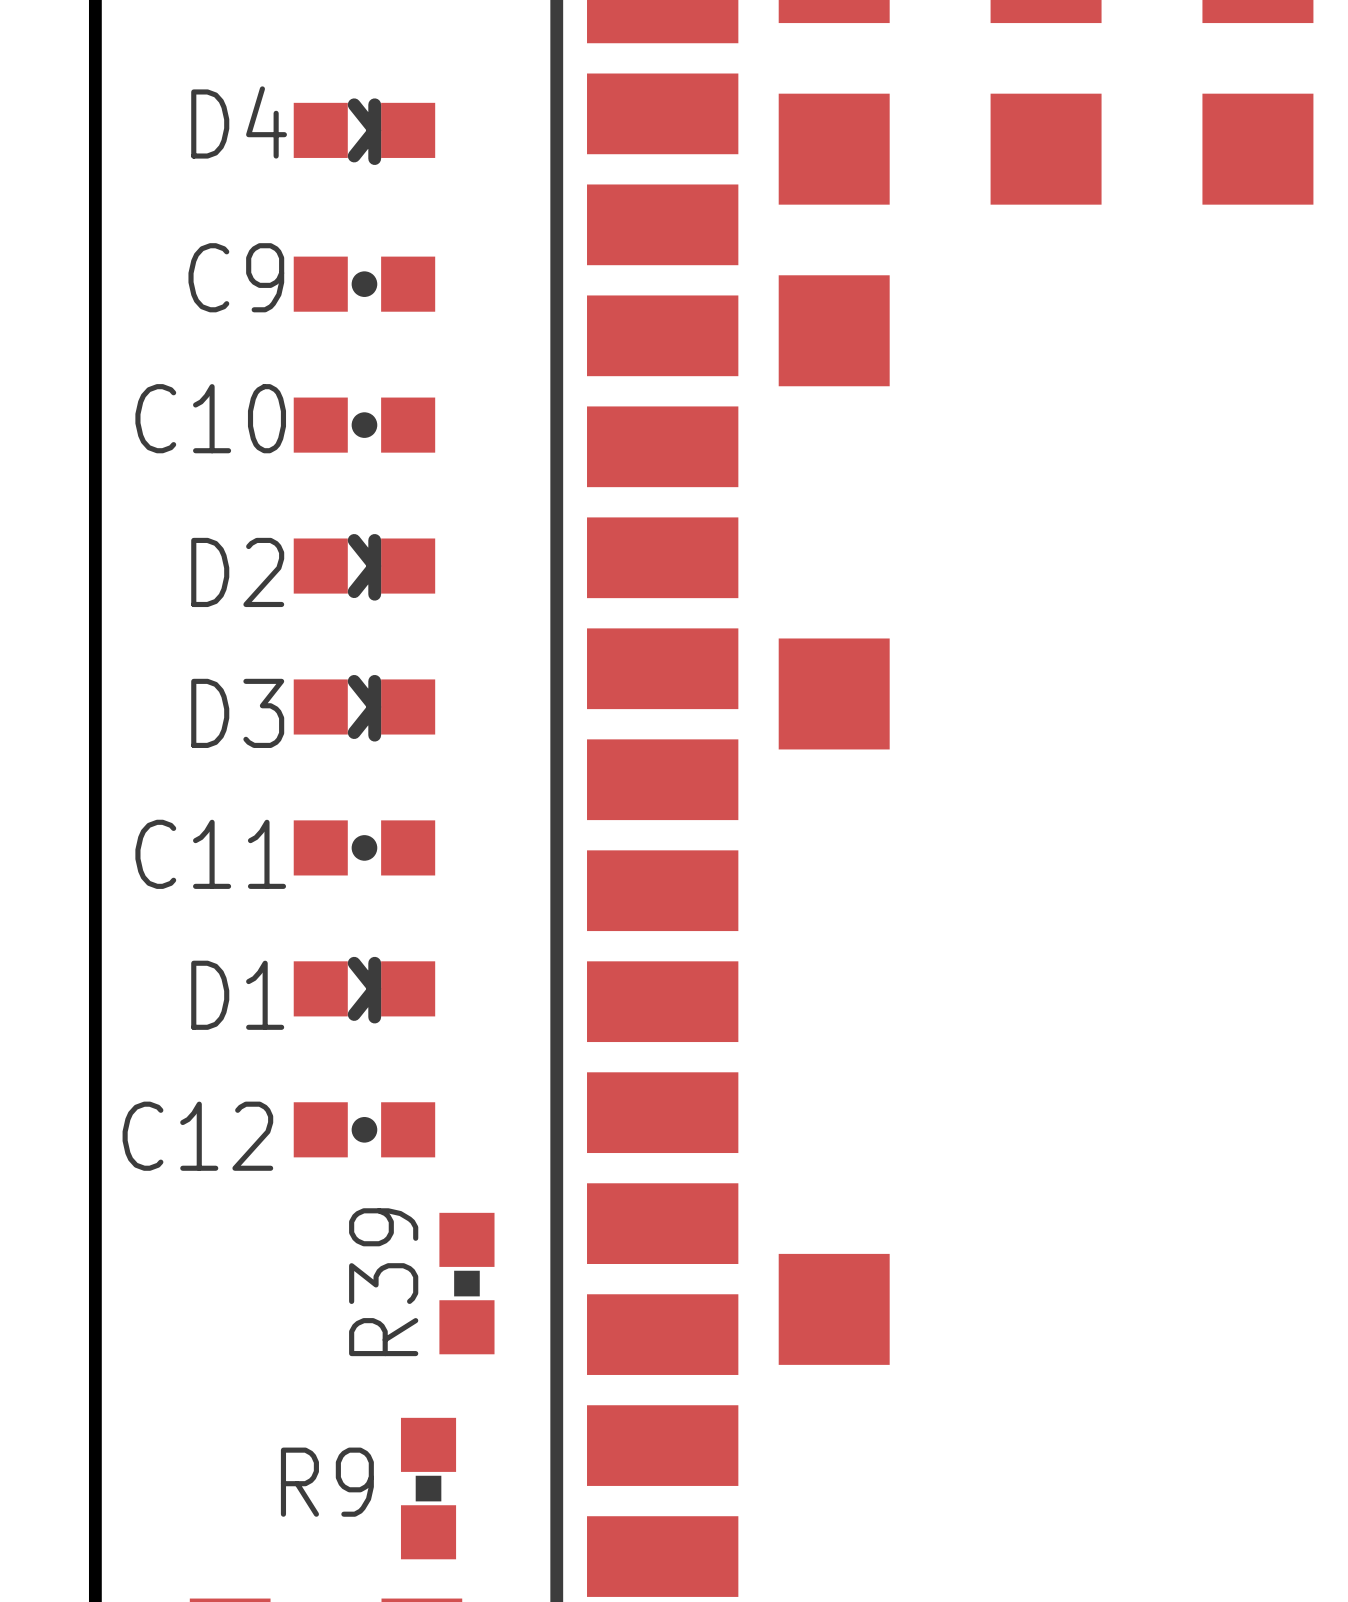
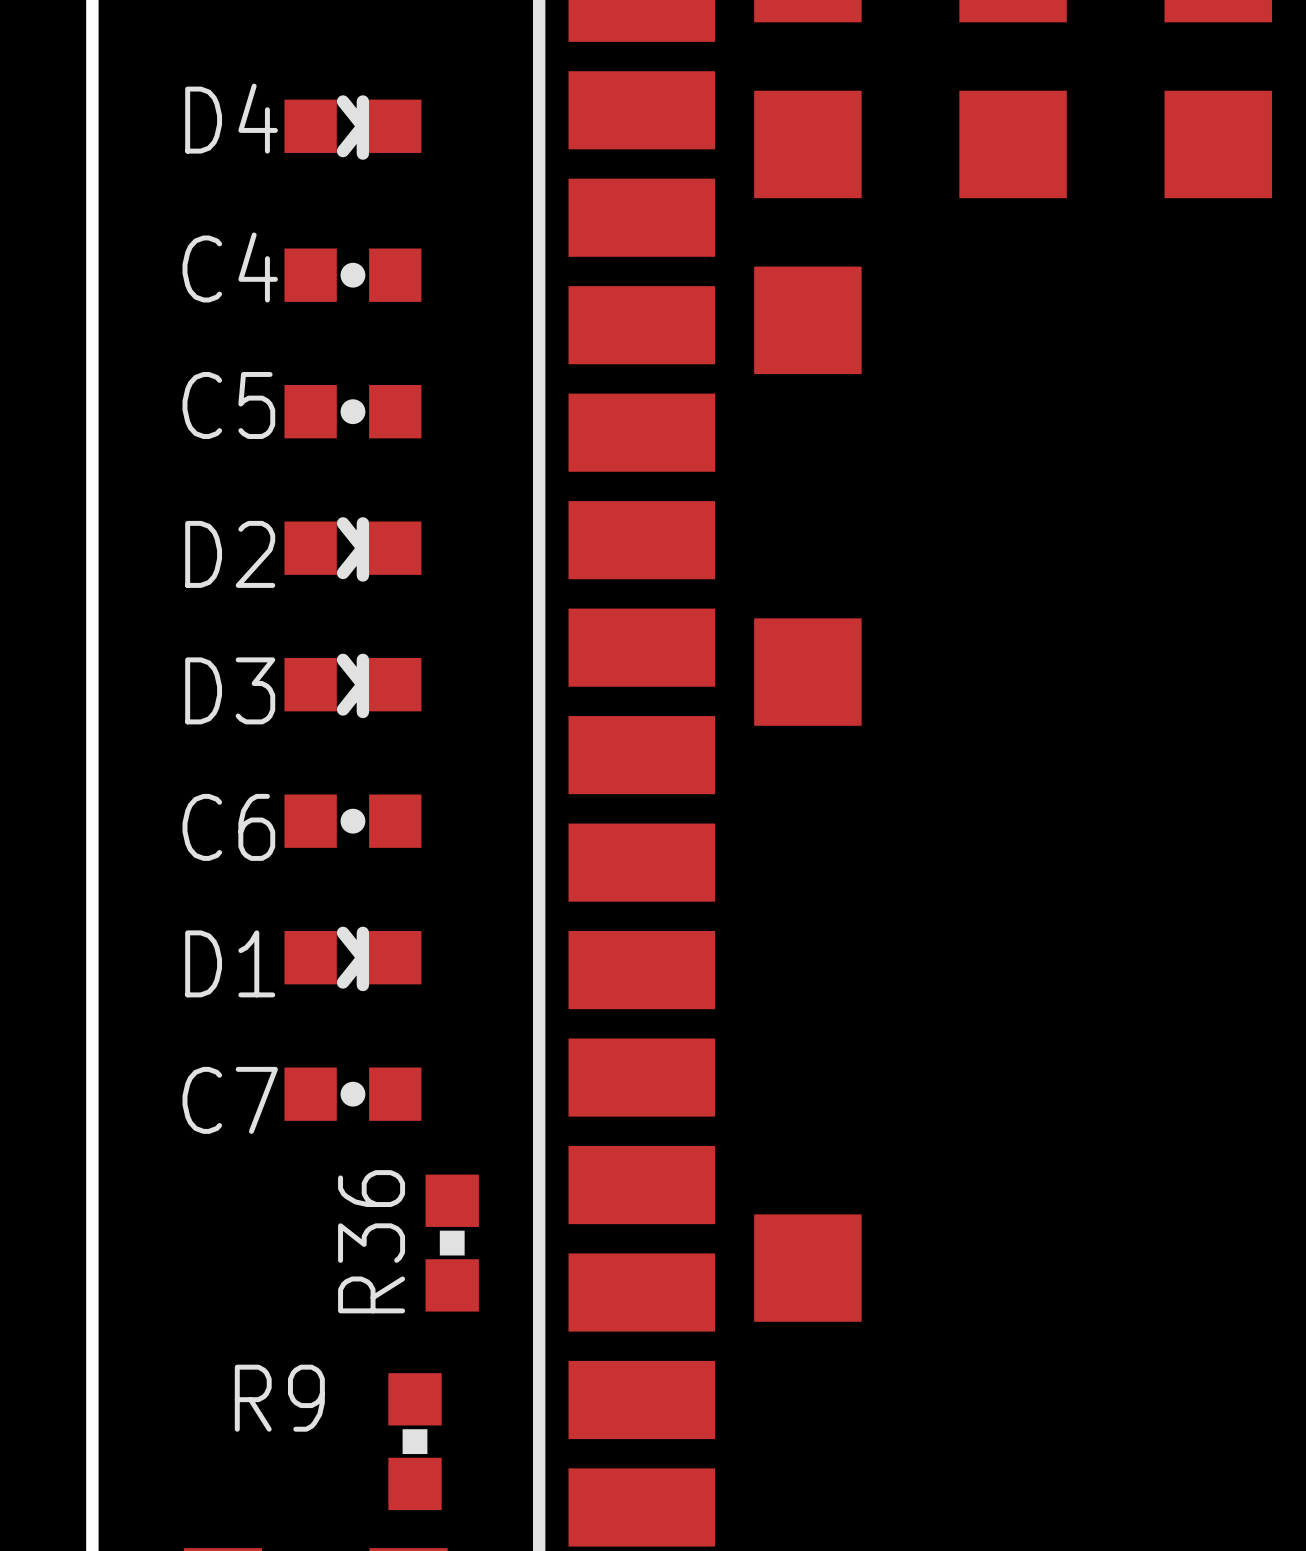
C9 name: C9 (236, 277) -> C4 (230, 267)
C10 name: C10 (210, 418) -> C5 (228, 405)
C11 name: C11 (210, 854) -> C6 (228, 827)
C12 name: C12 (197, 1136) -> C7 (230, 1100)
R39 name: R39 (383, 1282) -> R36 (371, 1241)
R9 name position: R9 (327, 1482) -> R9 (279, 1398)

